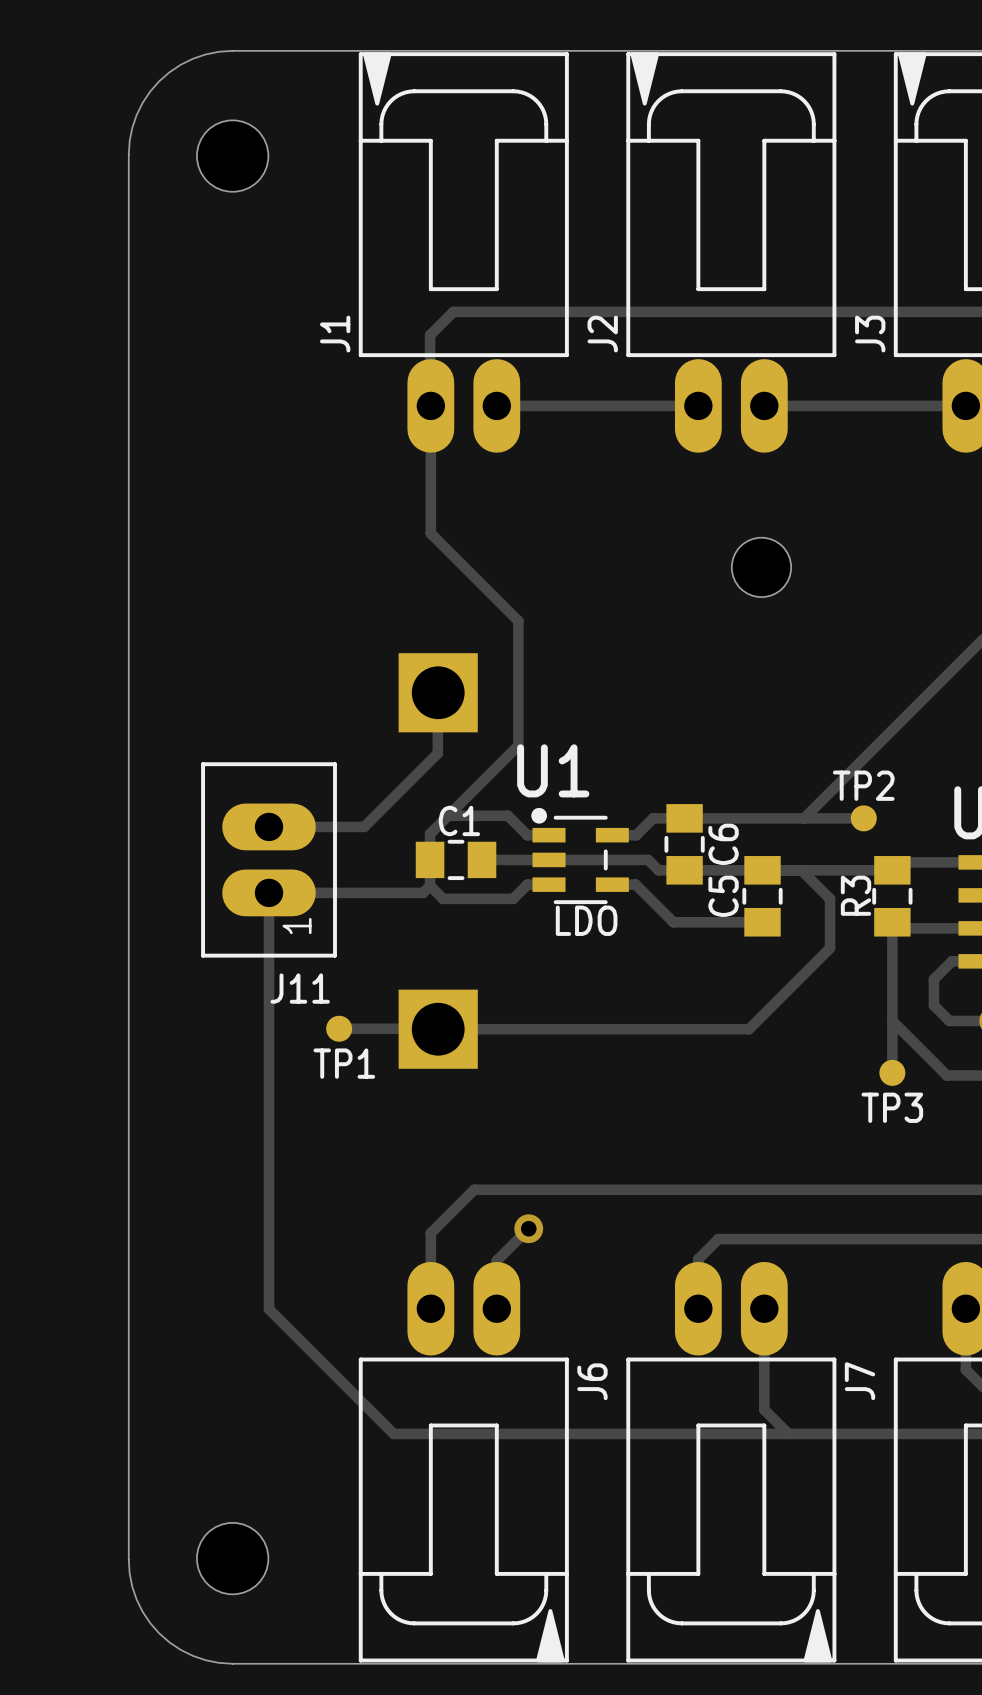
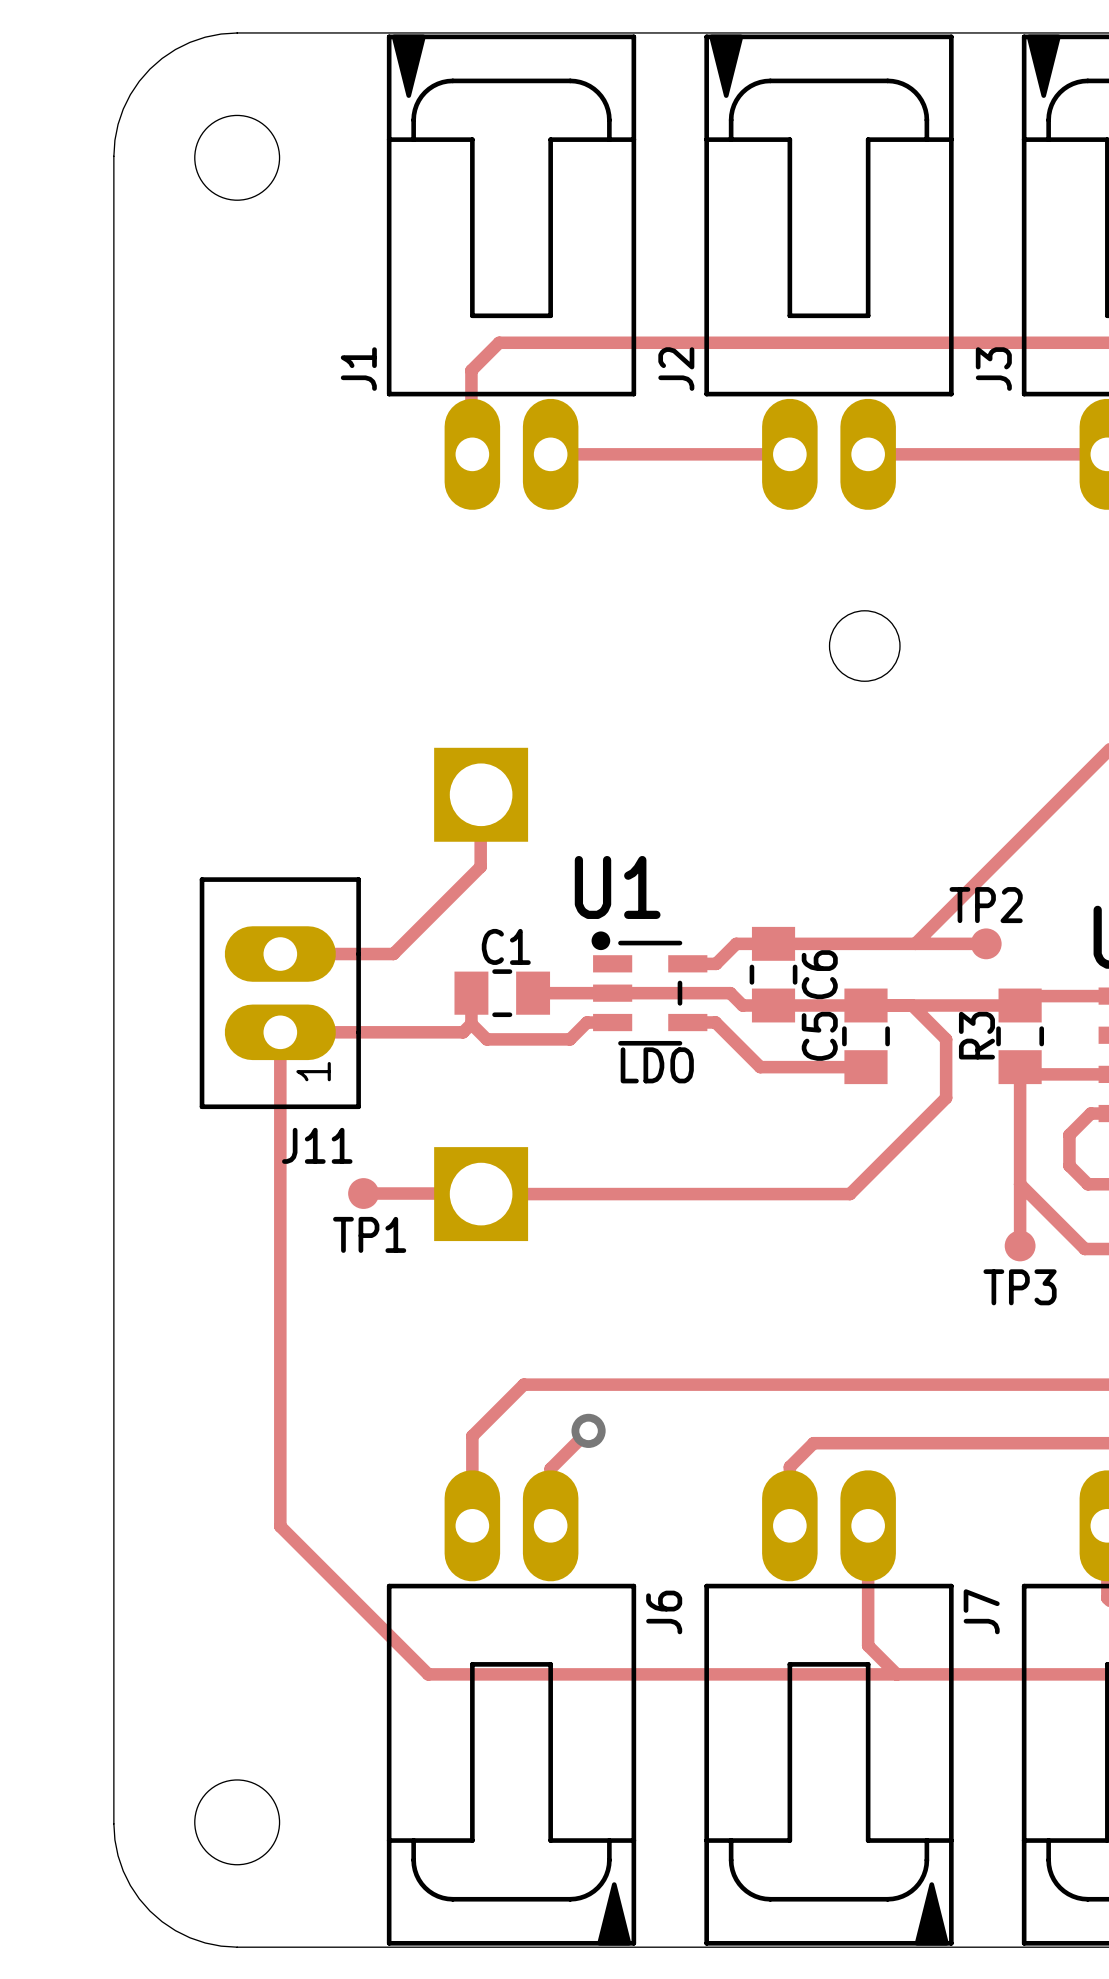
track: (430, 405) (430, 533) (518, 620) (518, 745) (430, 833) (430, 859) -> none
track: (448, 815) (507, 815) (527, 835) (549, 835) -> none

